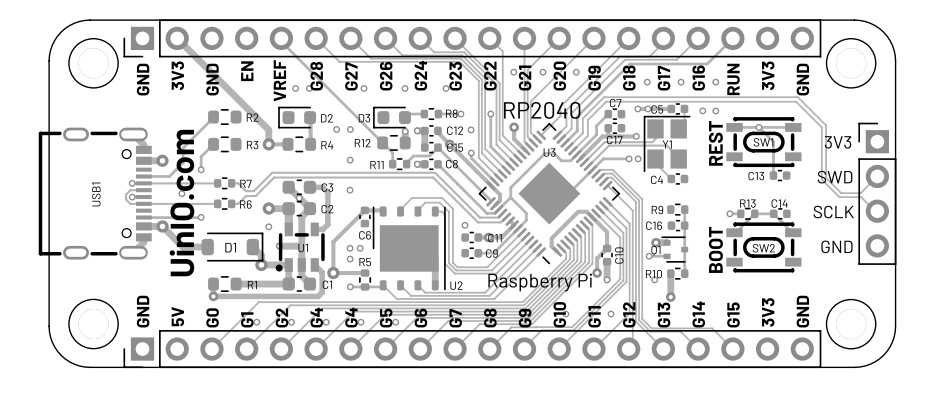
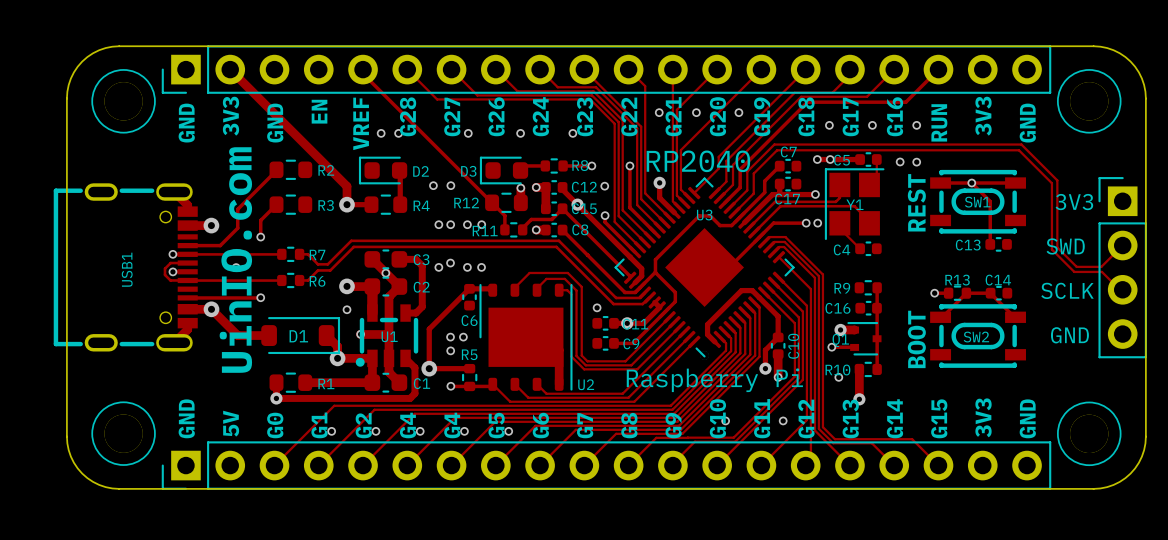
via: none -> (438, 224)
via: none -> (467, 224)
via: none -> (481, 224)
via: none -> (438, 267)
via: none -> (467, 267)
via: none -> (481, 267)

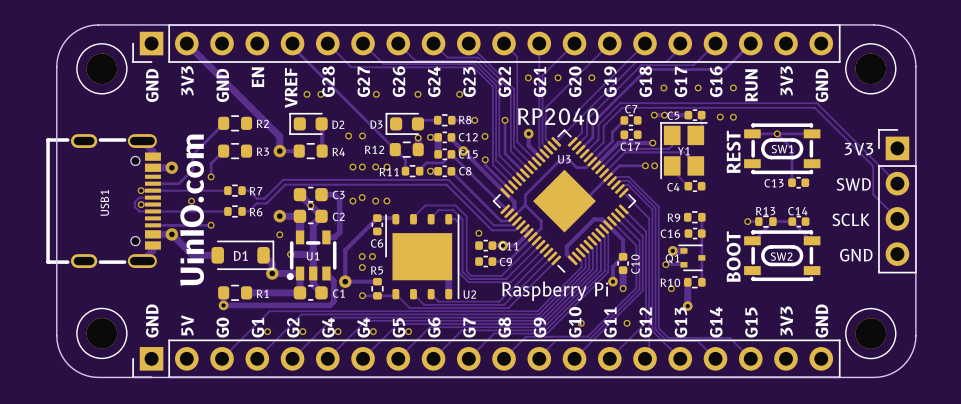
track: (1021, 144) (1057, 180) (1057, 247) (1076, 266) (1101, 266) (1122, 245) -> (817, 103) (897, 183)
track: (1051, 183) (1051, 249) (1074, 271) (1101, 271) (1119, 289) -> (841, 134) (873, 166) (873, 194) (897, 218)

